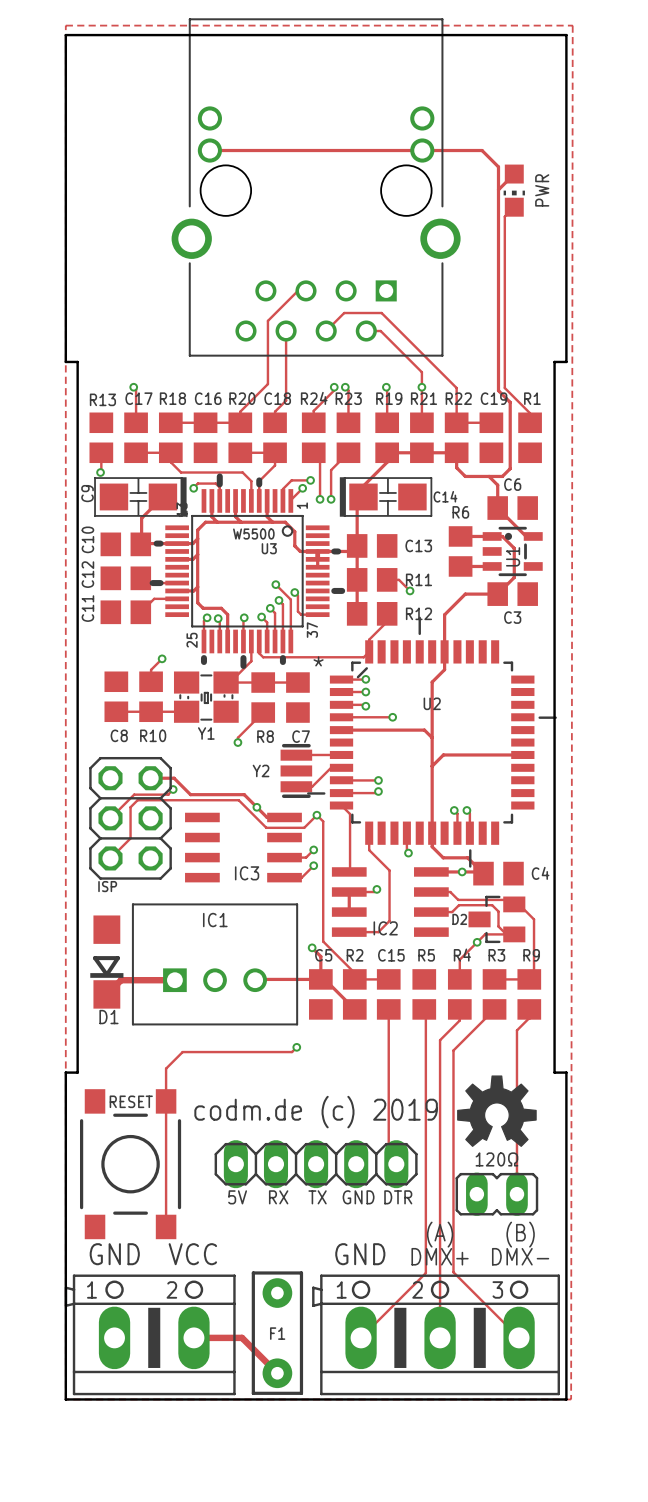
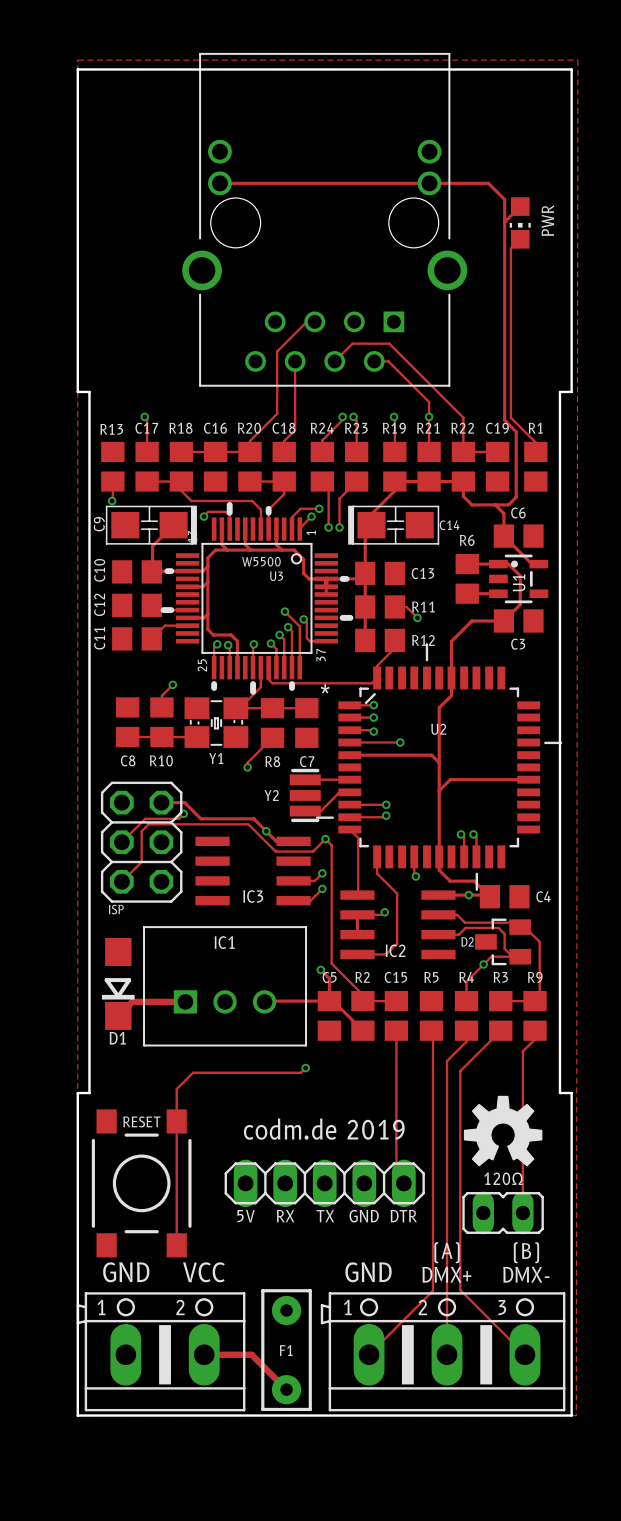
text: codm.de (c) 2019 (316, 1112) -> codm.de 2019 (324, 1129)

